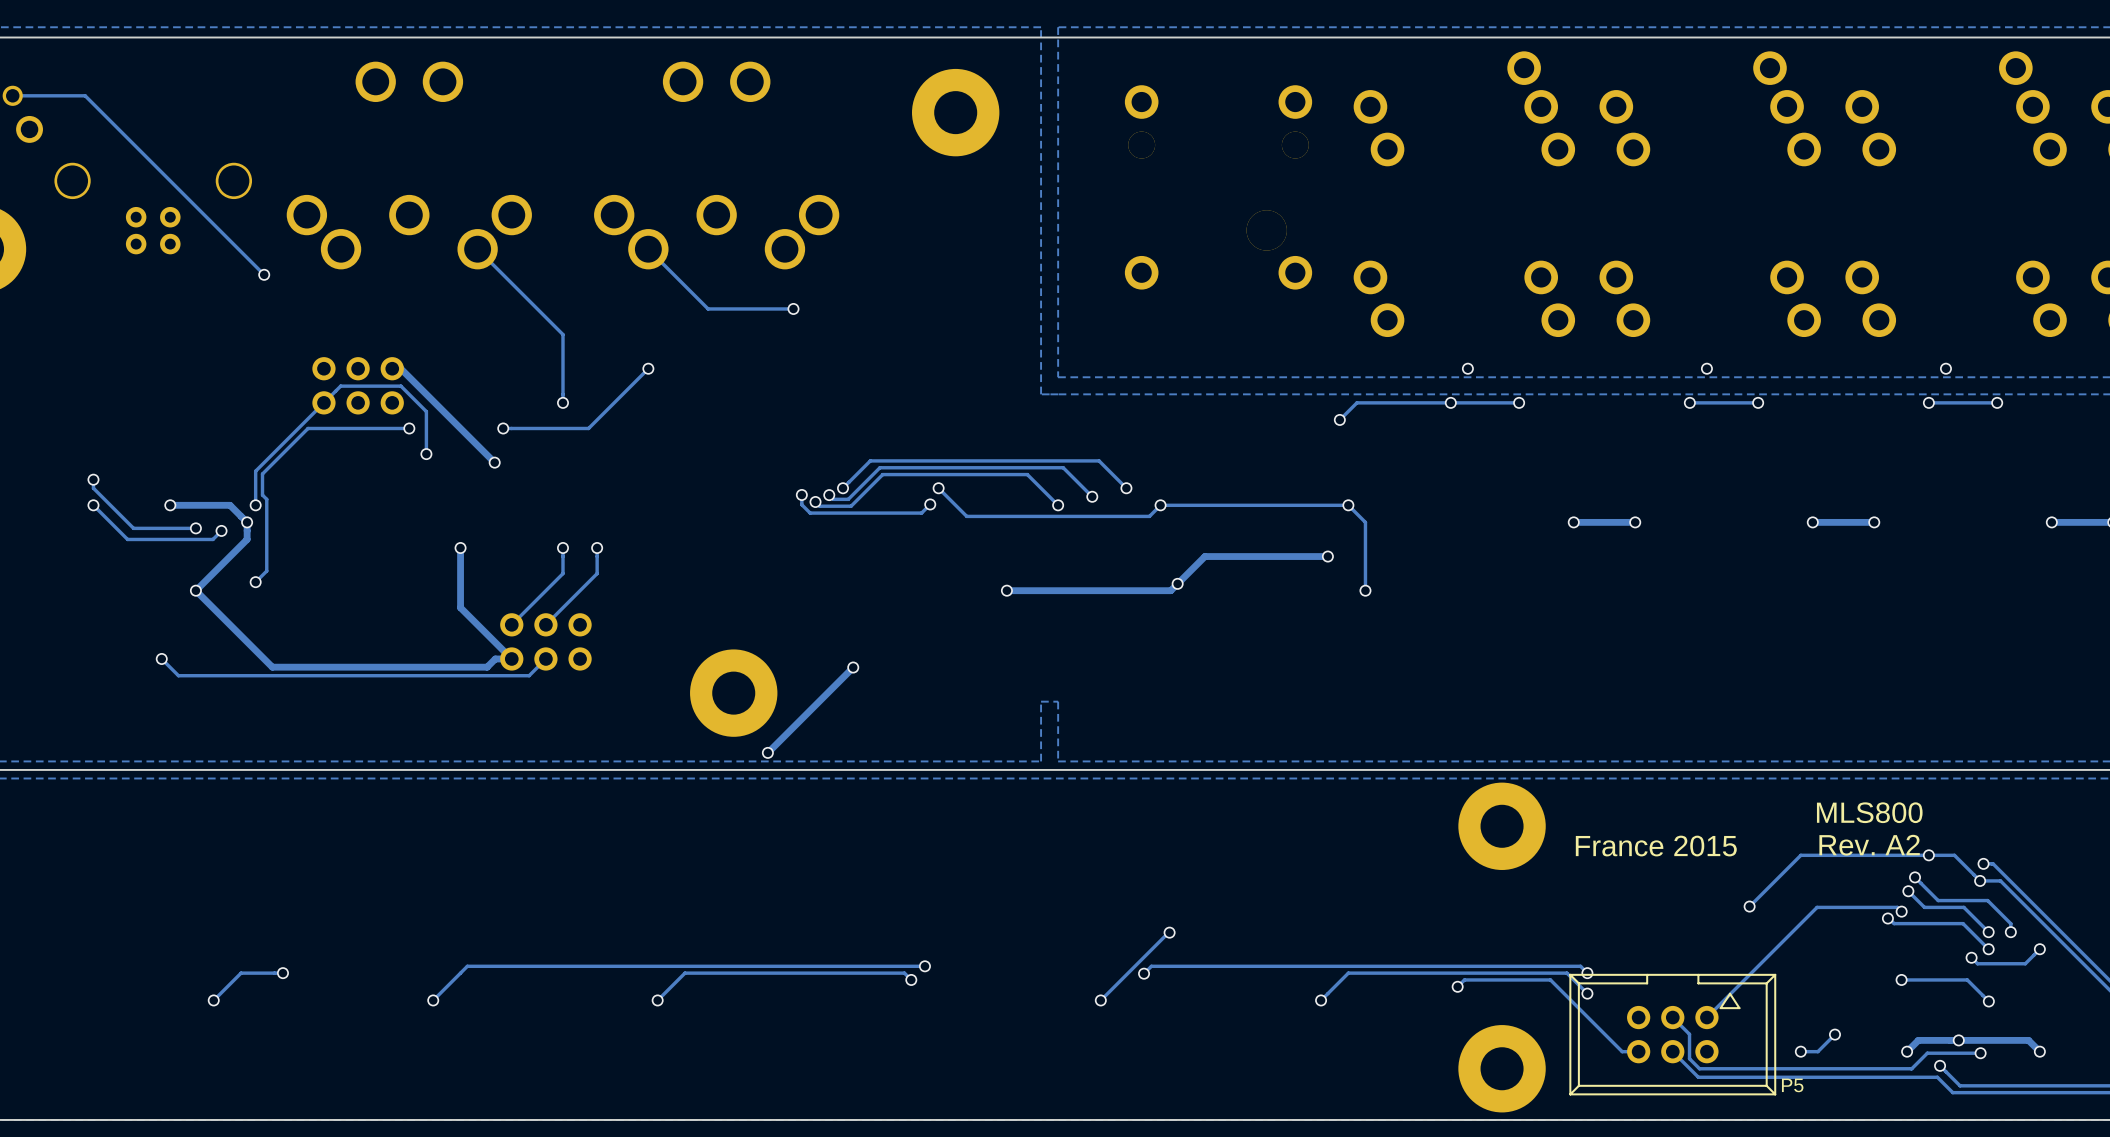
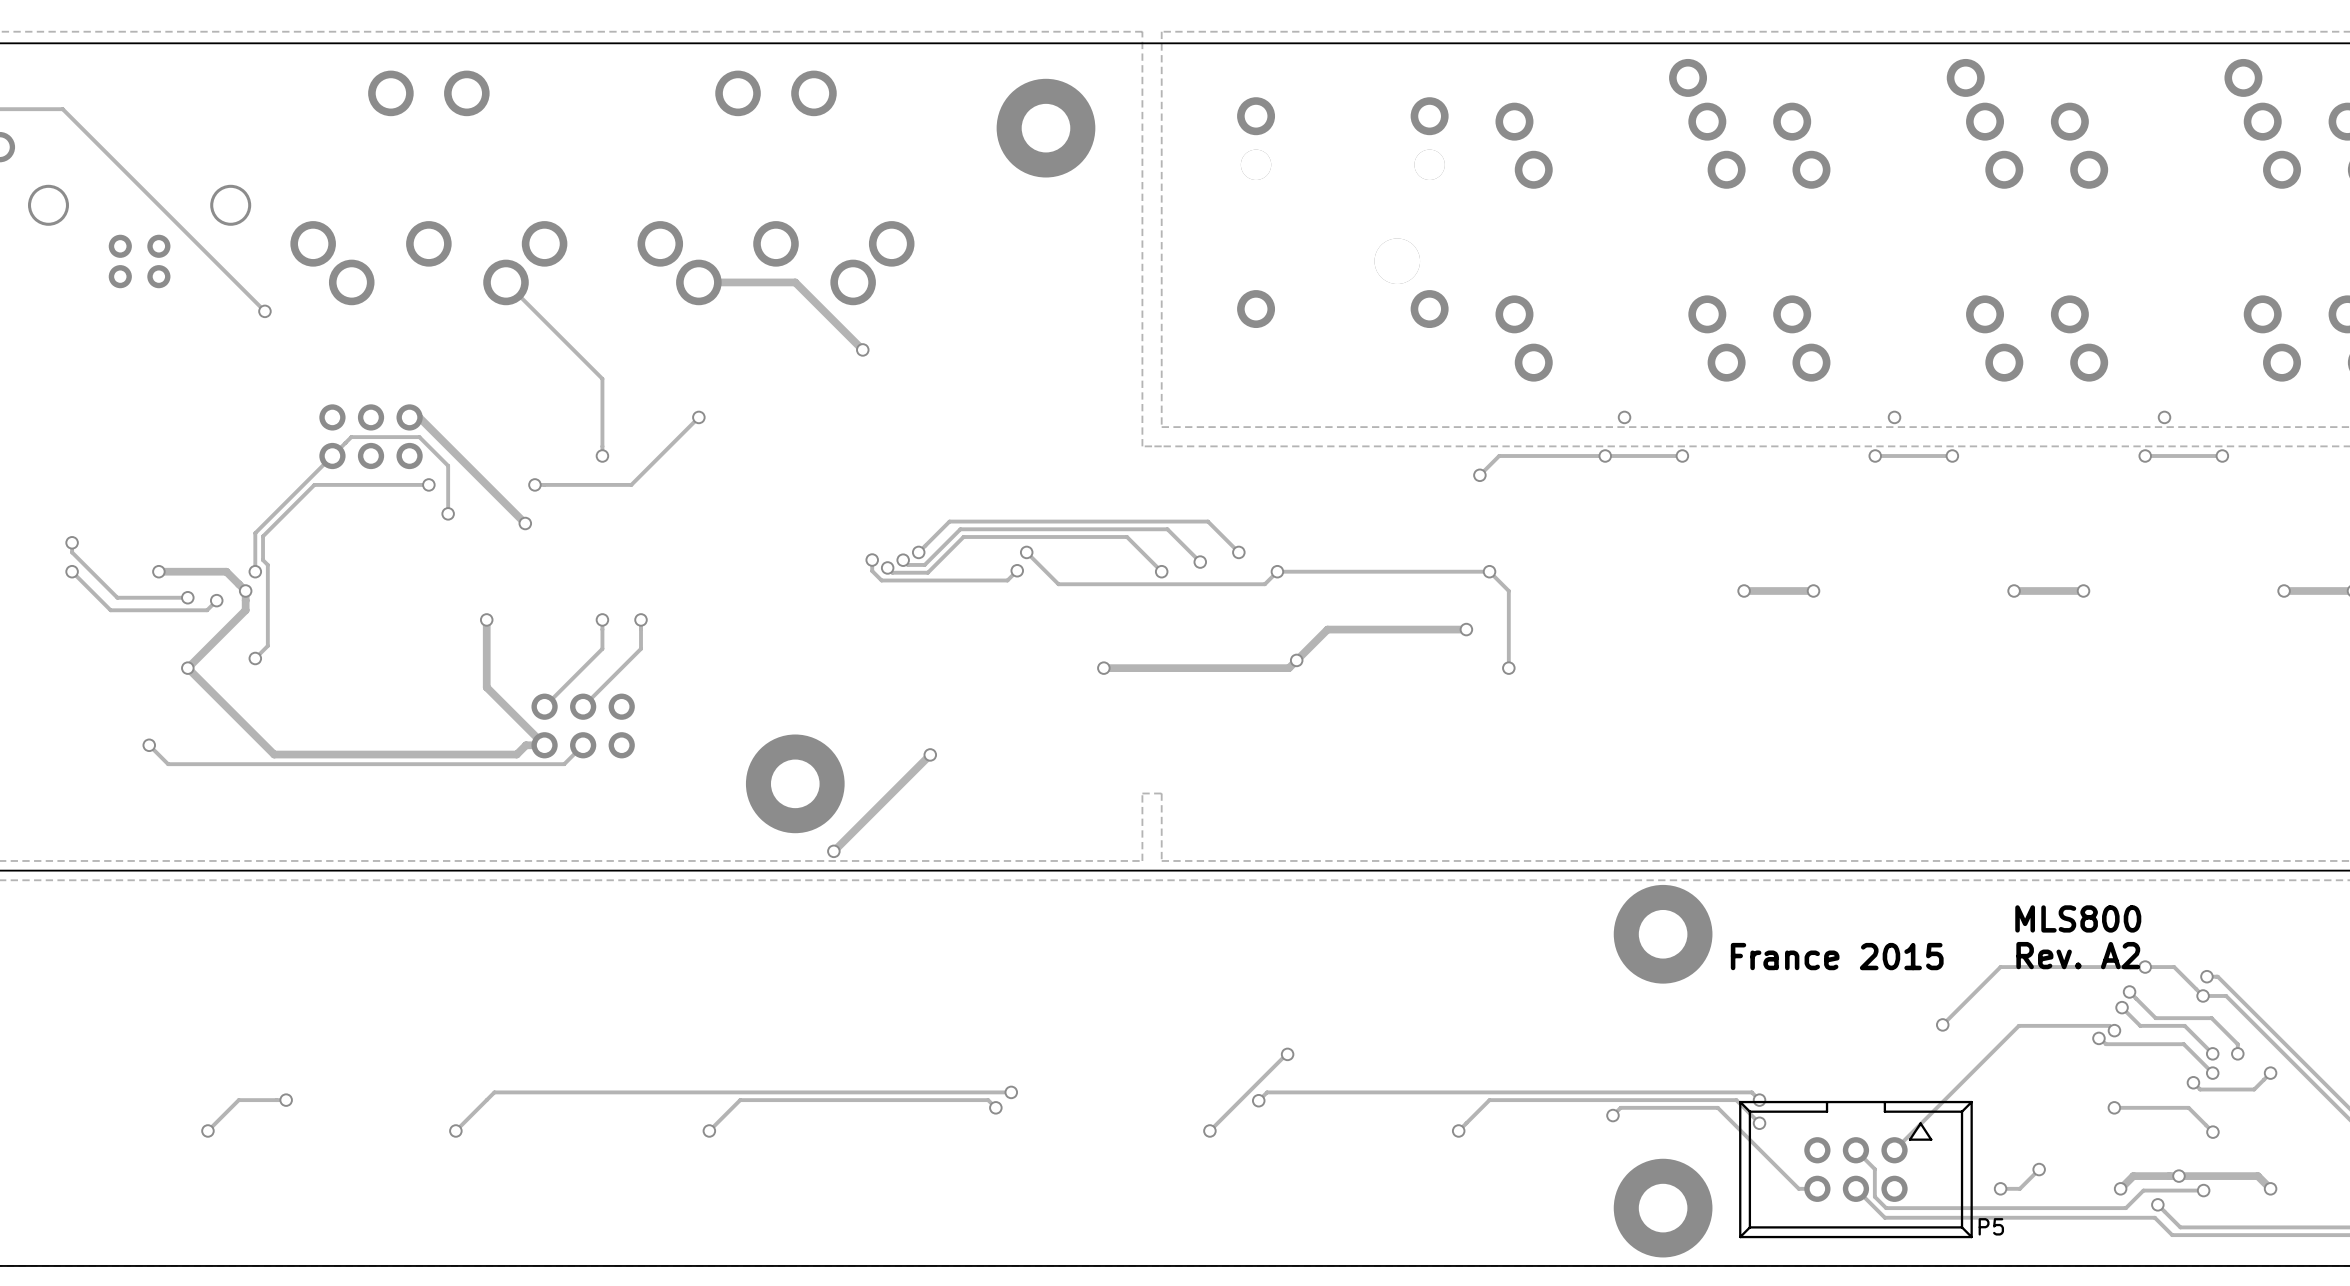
track: (648, 249) (708, 308) (793, 308) -> (698, 282) (795, 282) (862, 349)

